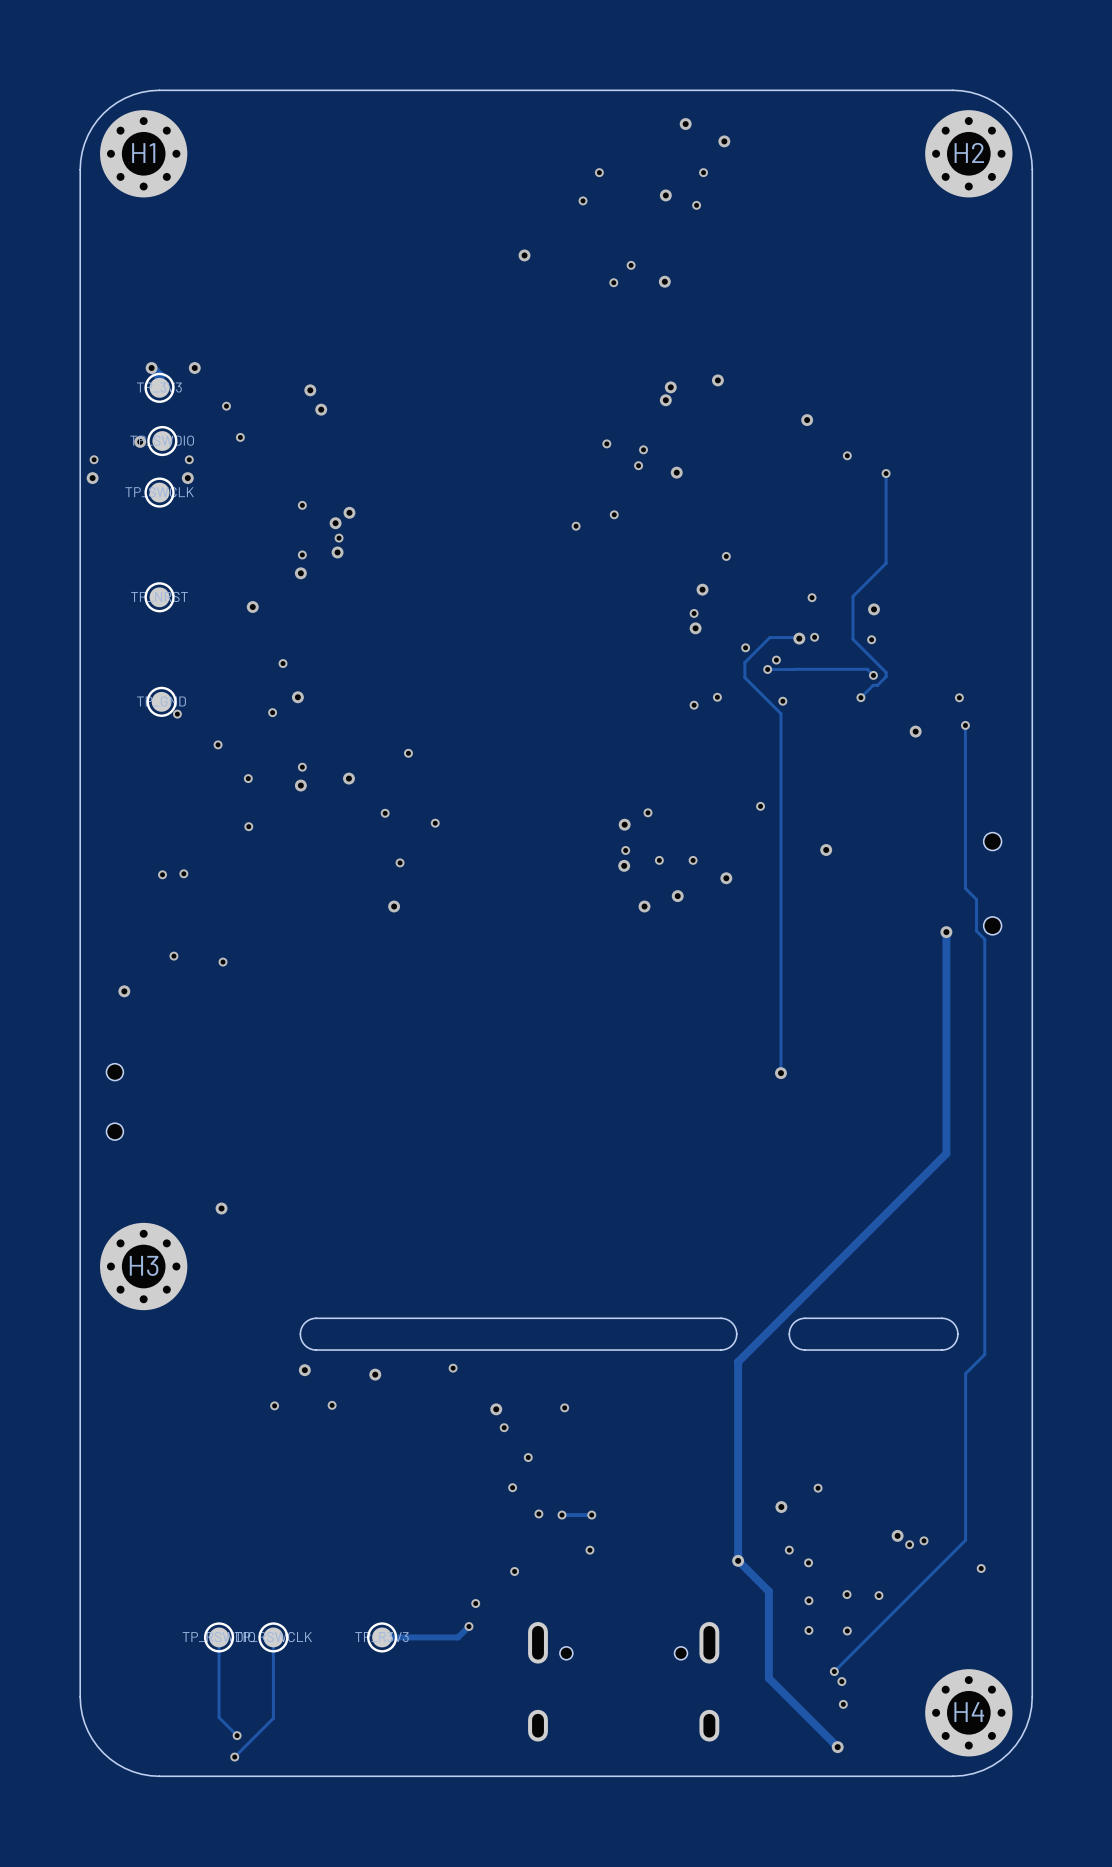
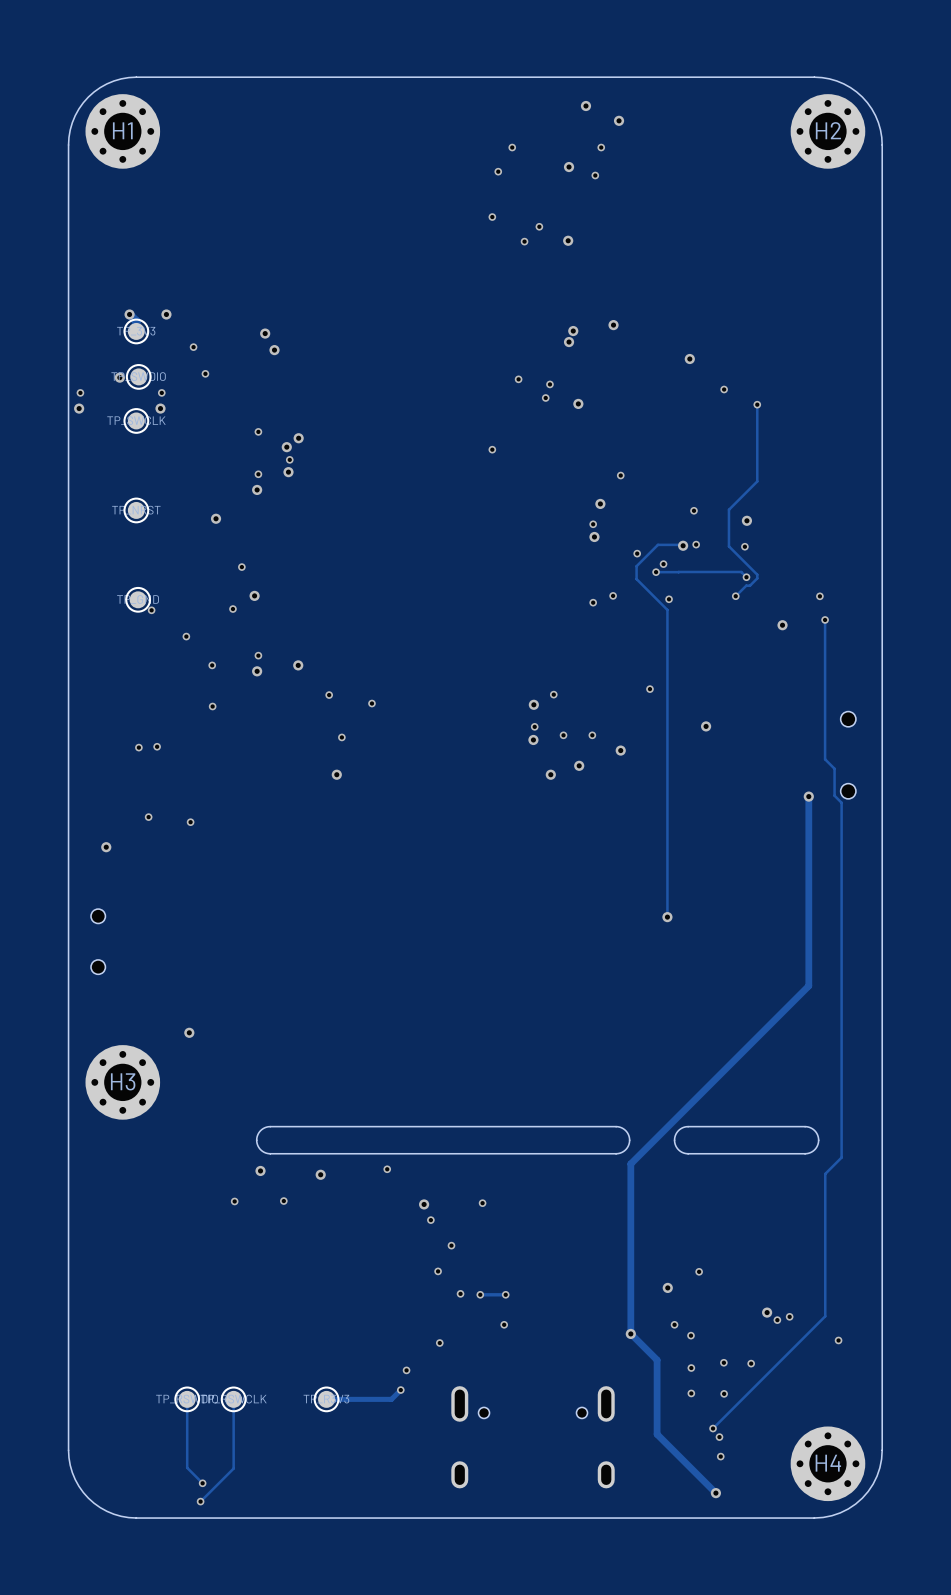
via: none -> (492, 217)
via: (524, 255) -> none
via: (614, 514) -> none
via: (408, 753) -> none

